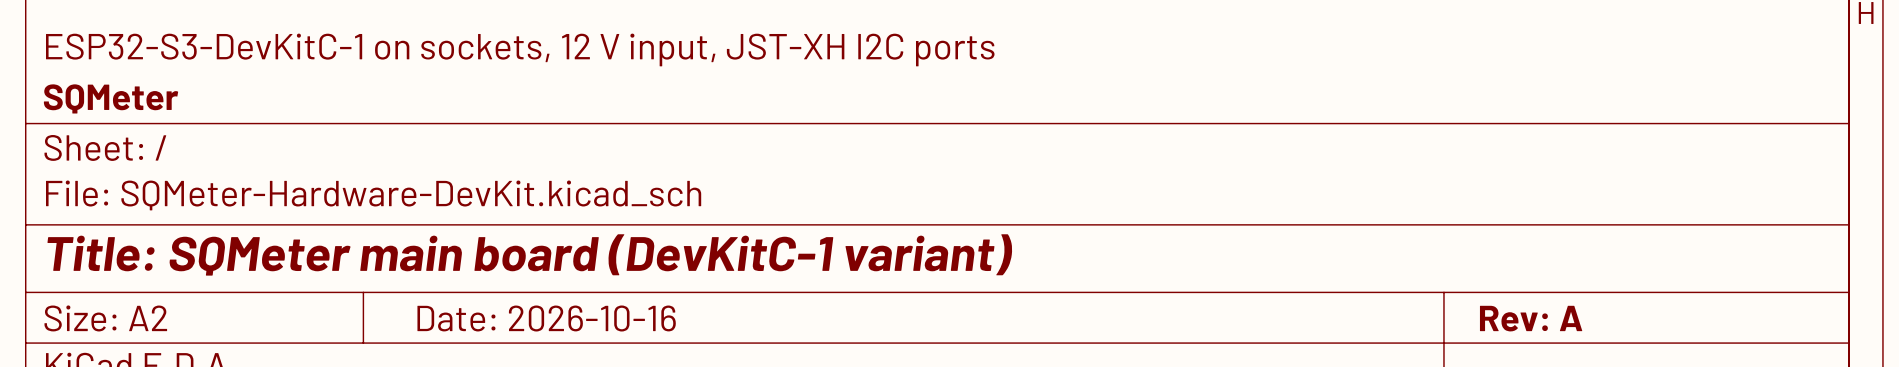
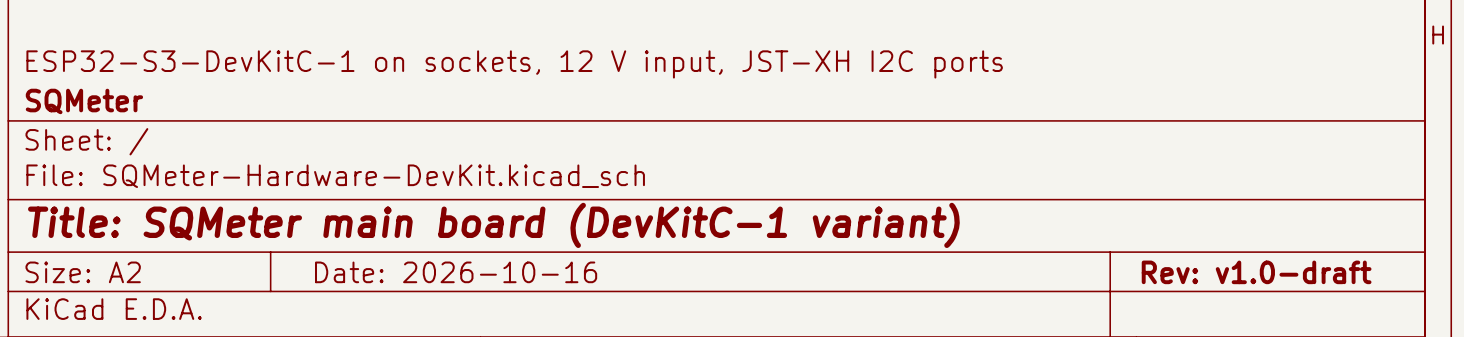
title block: Rev: A (1531, 318) -> Rev: v1.0-draft (1256, 272)

